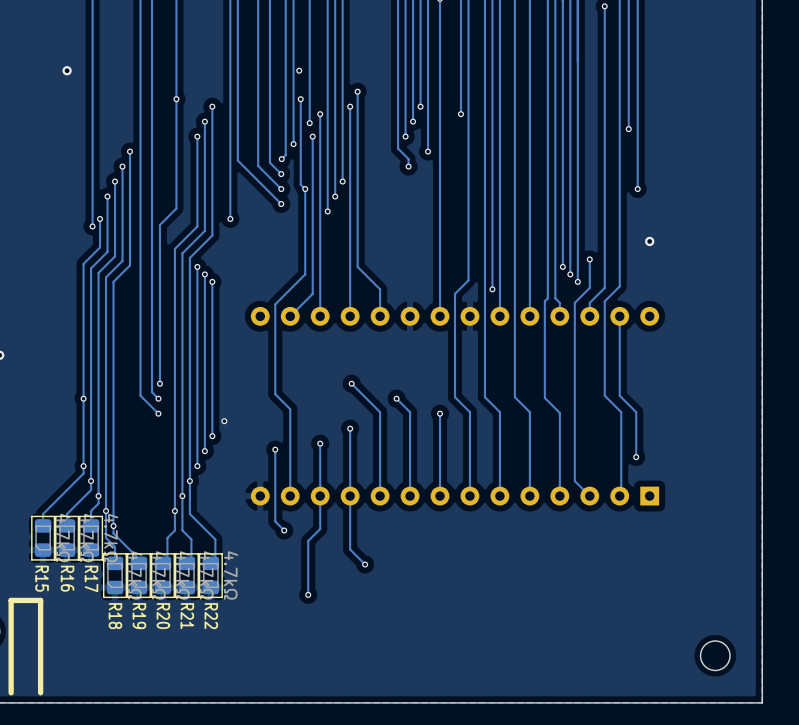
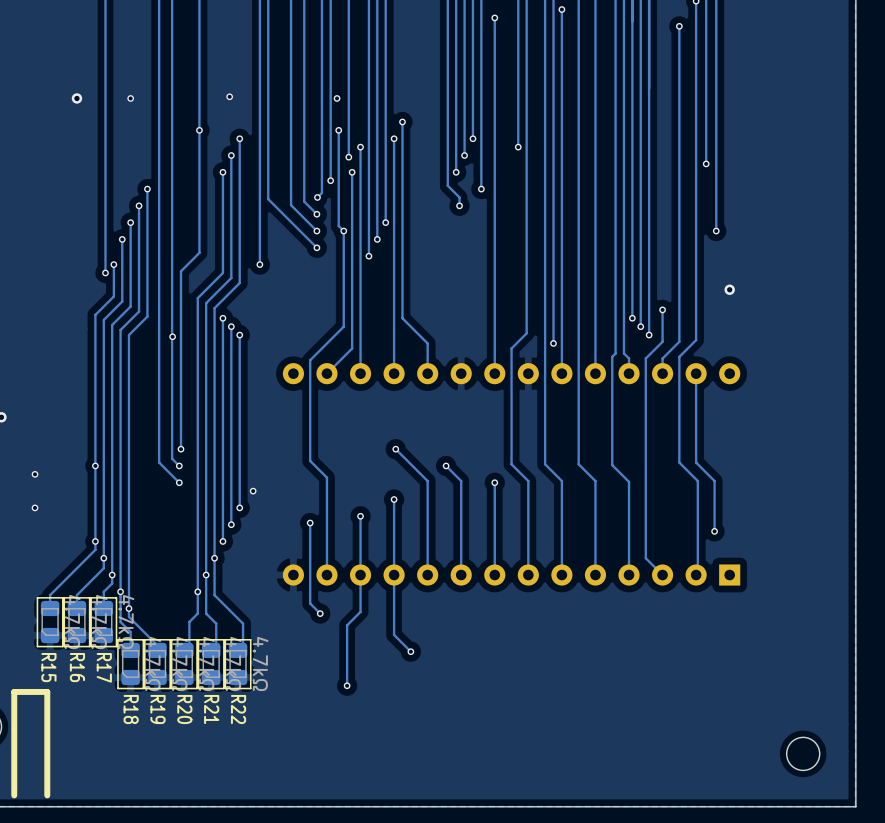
via: none -> (229, 96)
via: none -> (130, 98)
via: none -> (172, 336)
via: none -> (35, 474)
via: none -> (35, 507)

